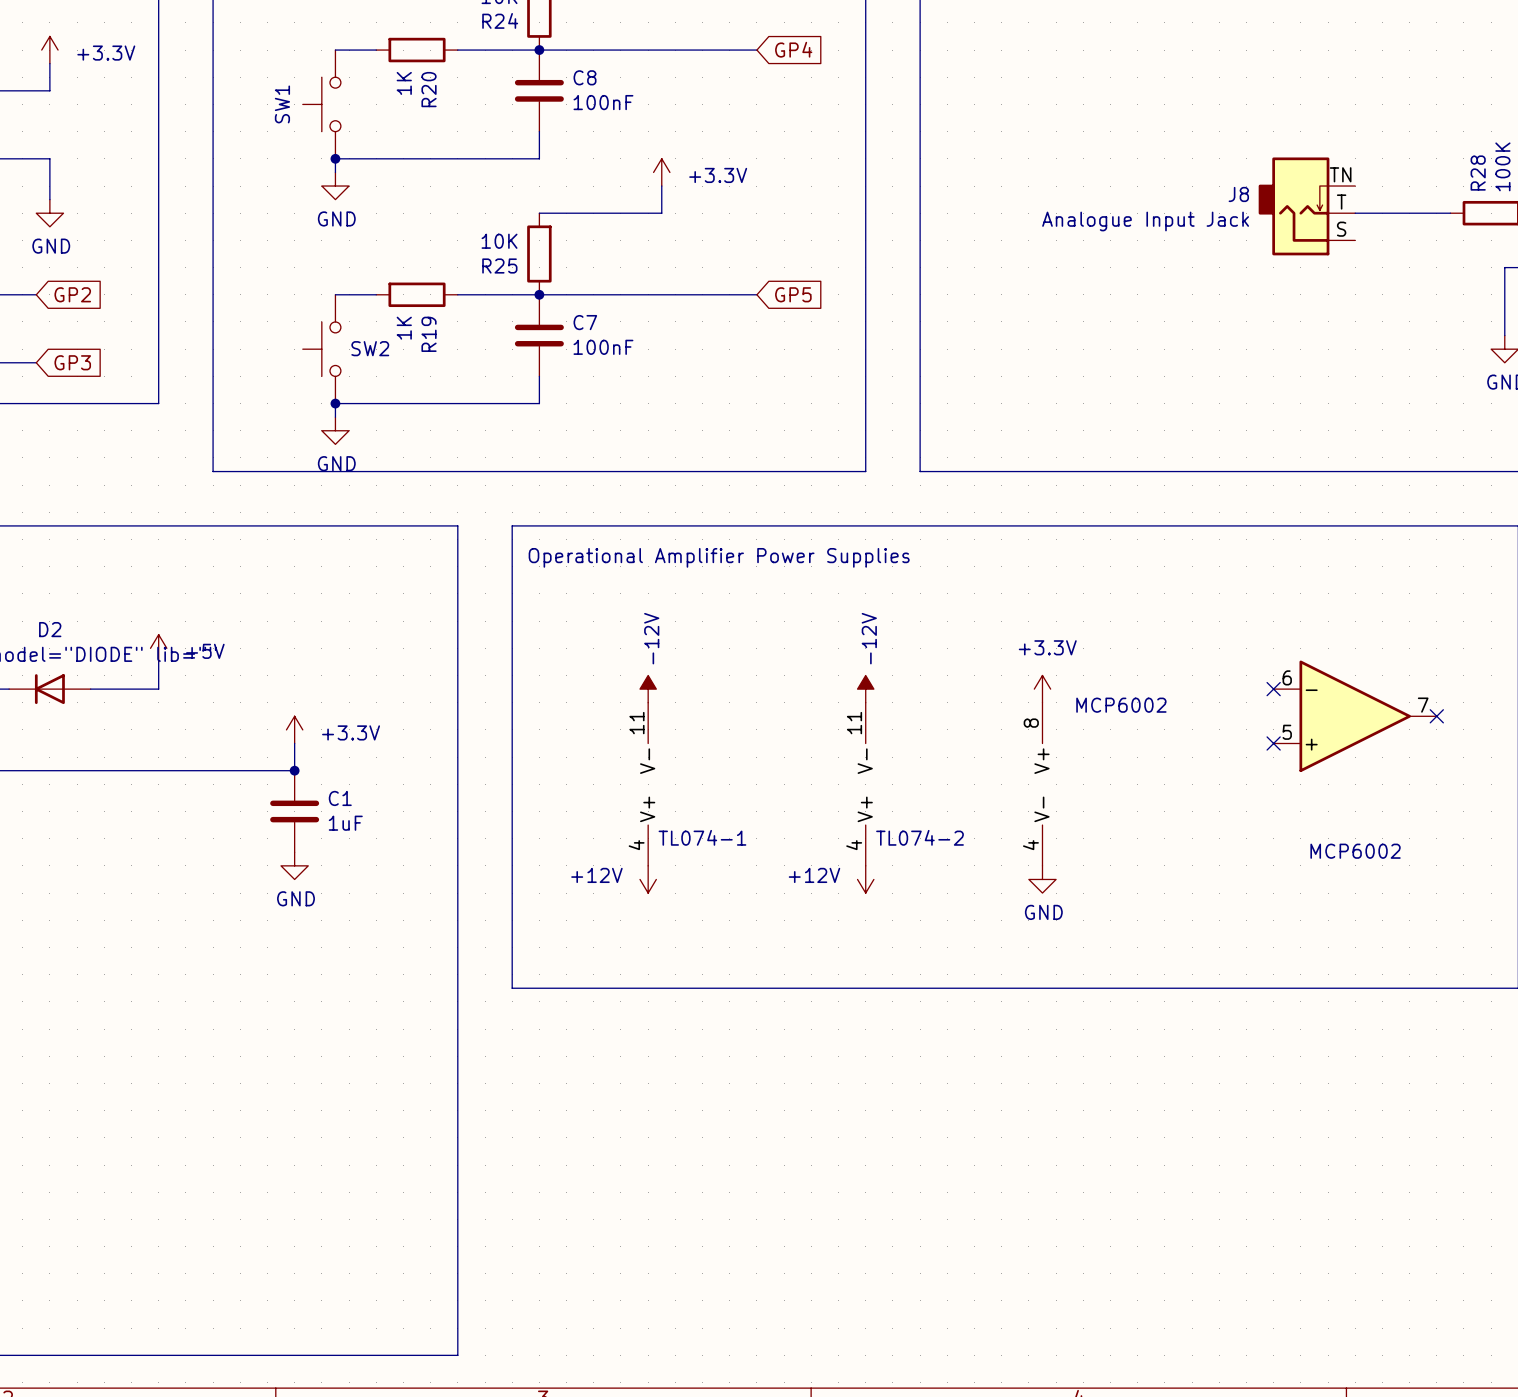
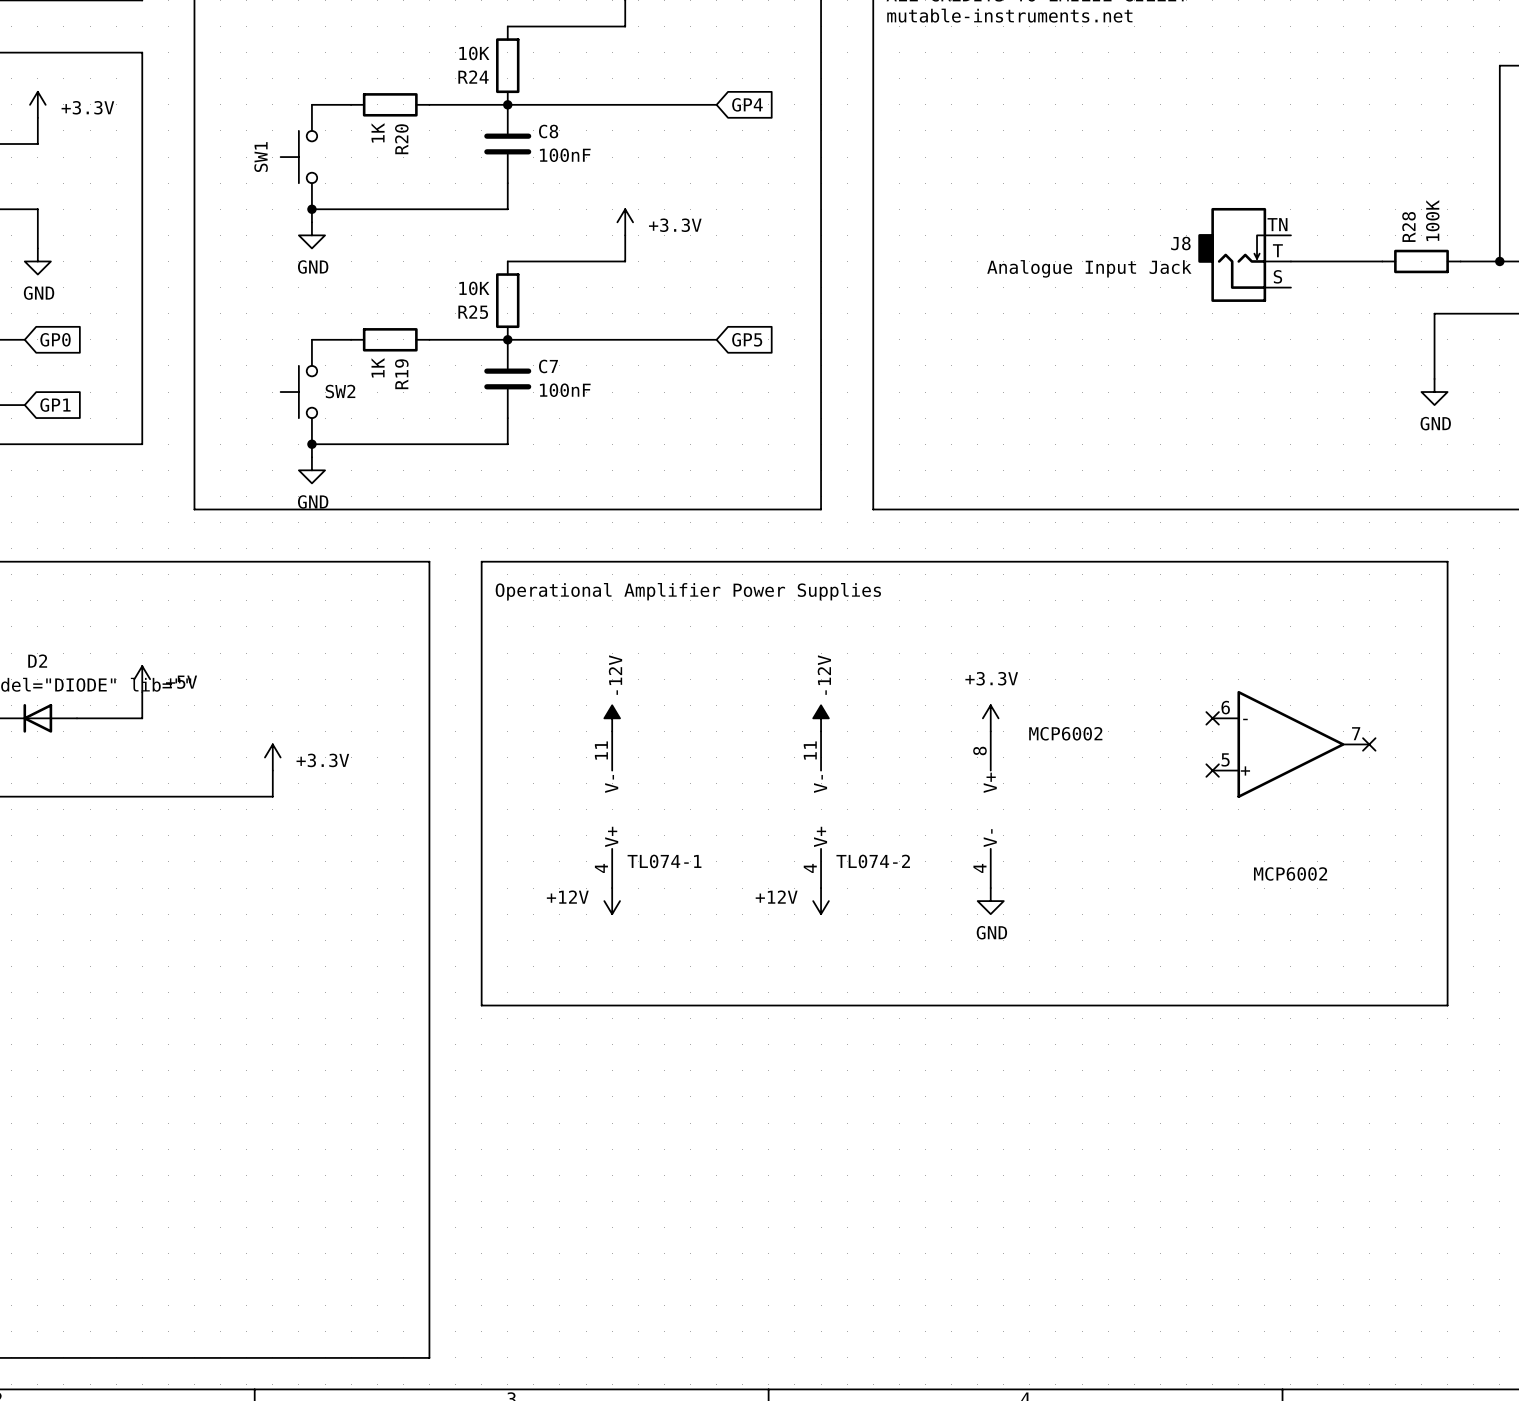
global label: GP2 (72, 294) -> GP0 (55, 339)
global label: GP3 (72, 362) -> GP1 (55, 405)
junction: (294, 770) -> none
C1: 1uF (294, 811) -> none
power symbol: GND (294, 865) -> none

